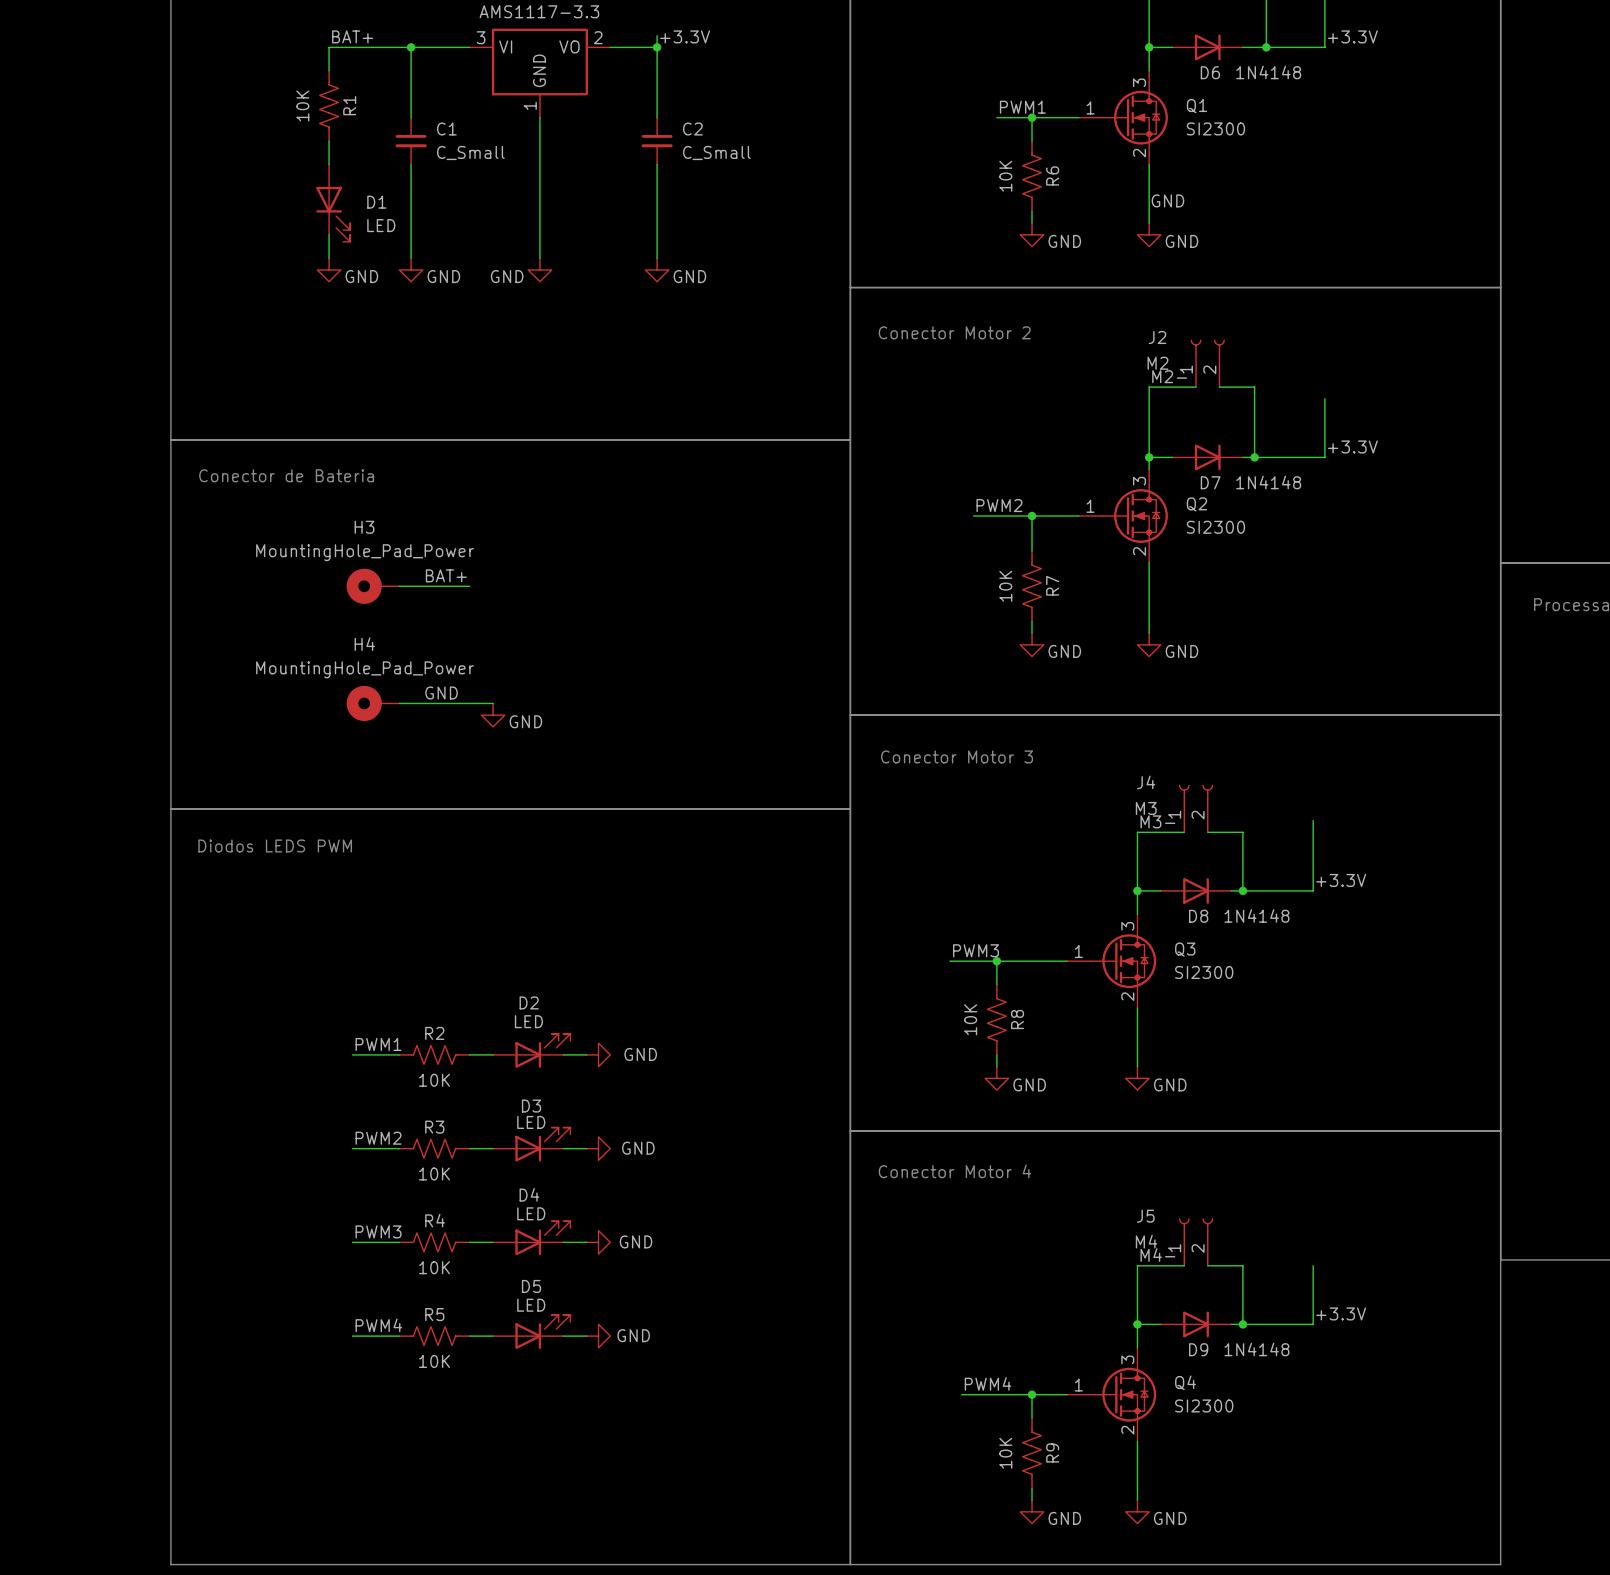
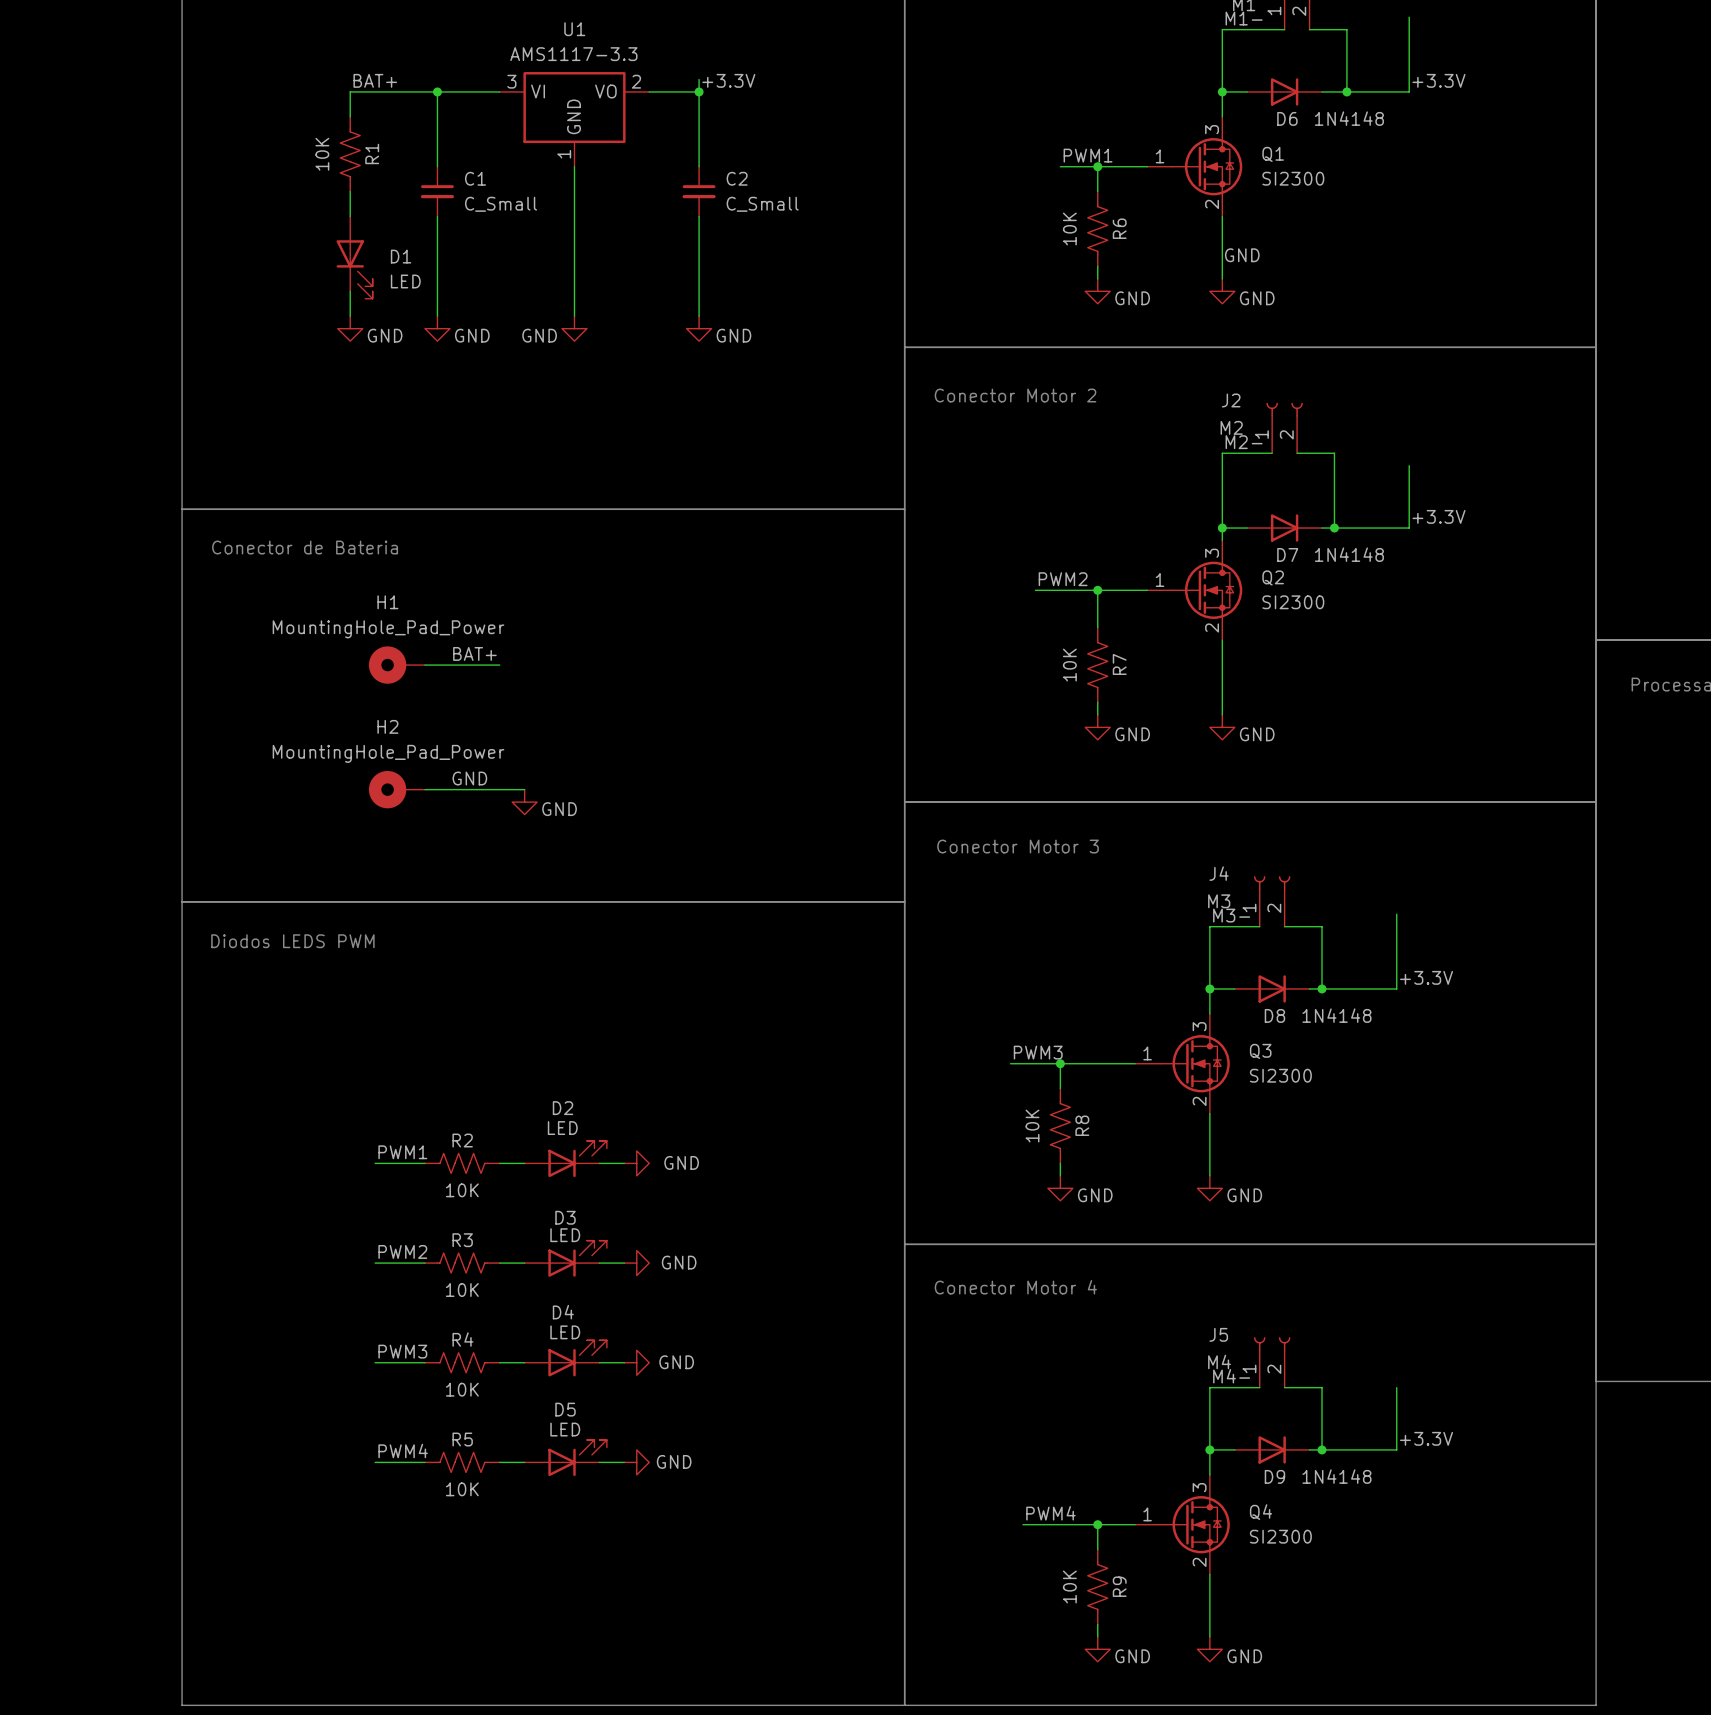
H3 name: H3 (364, 527) -> H1 (387, 602)
H4 name: H4 (364, 644) -> H2 (387, 726)

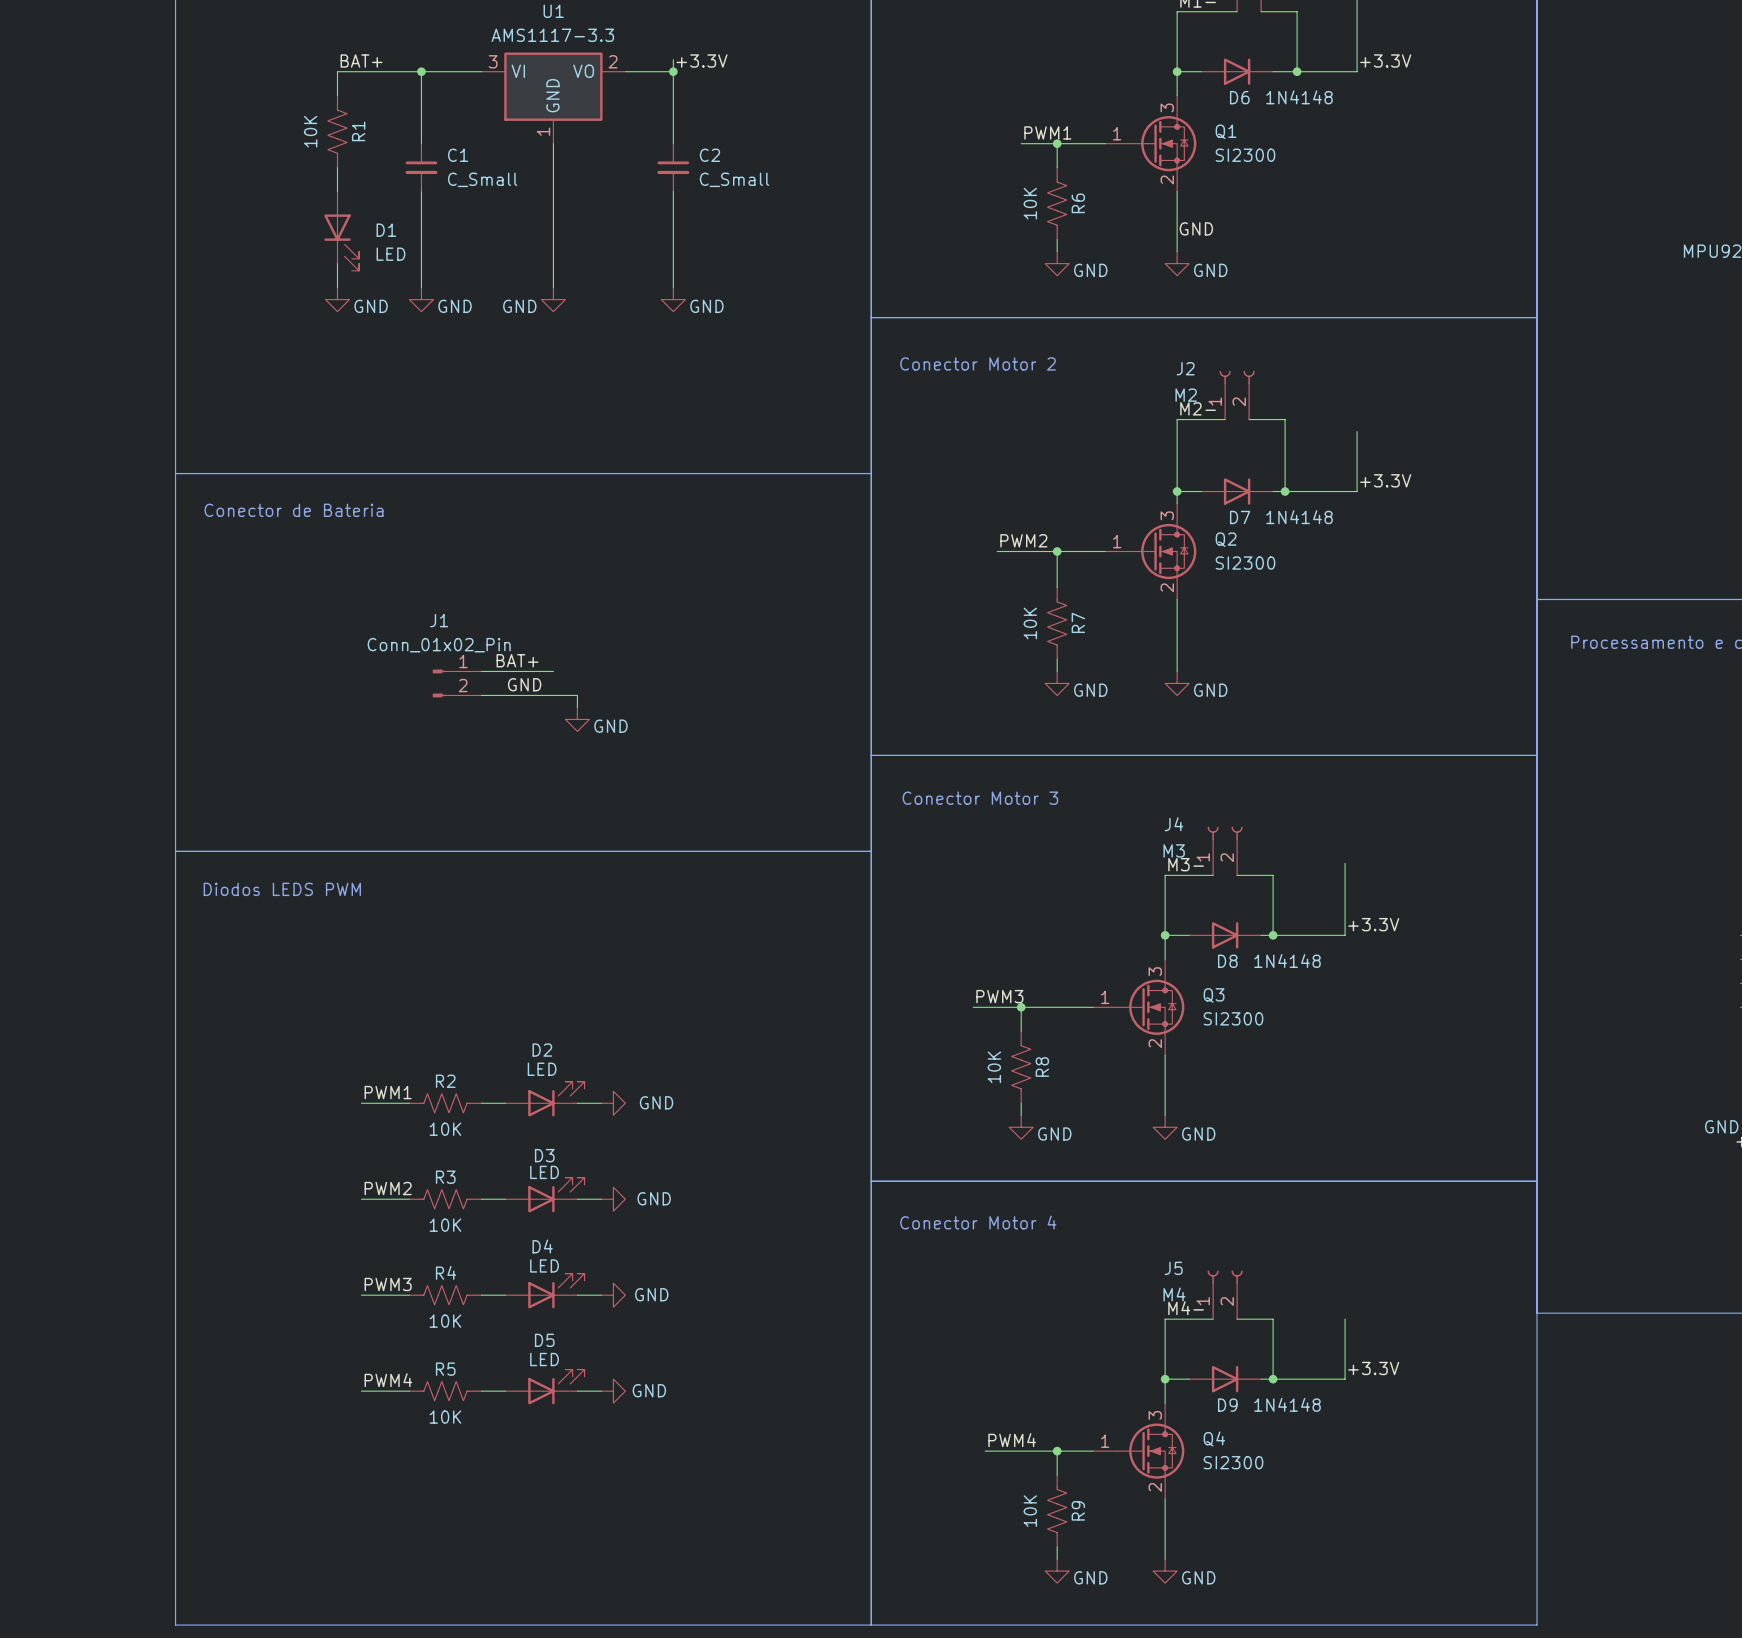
label position: BAT+ (474, 653) -> BAT+ (517, 660)
H1: MountingHole_Pad_Power (396, 665) -> none
wire: (424, 665) (499, 665) -> (481, 671) (553, 671)
J1: none -> Conn_01x02_Pin (457, 683)
wire: none -> (481, 695) (577, 695) (577, 707)
label position: GND (469, 778) -> GND (524, 684)
H2: MountingHole_Pad_Power (396, 789) -> none
wire: (424, 789) (524, 789) -> none
power symbol position: GND (524, 802) -> GND (577, 719)

